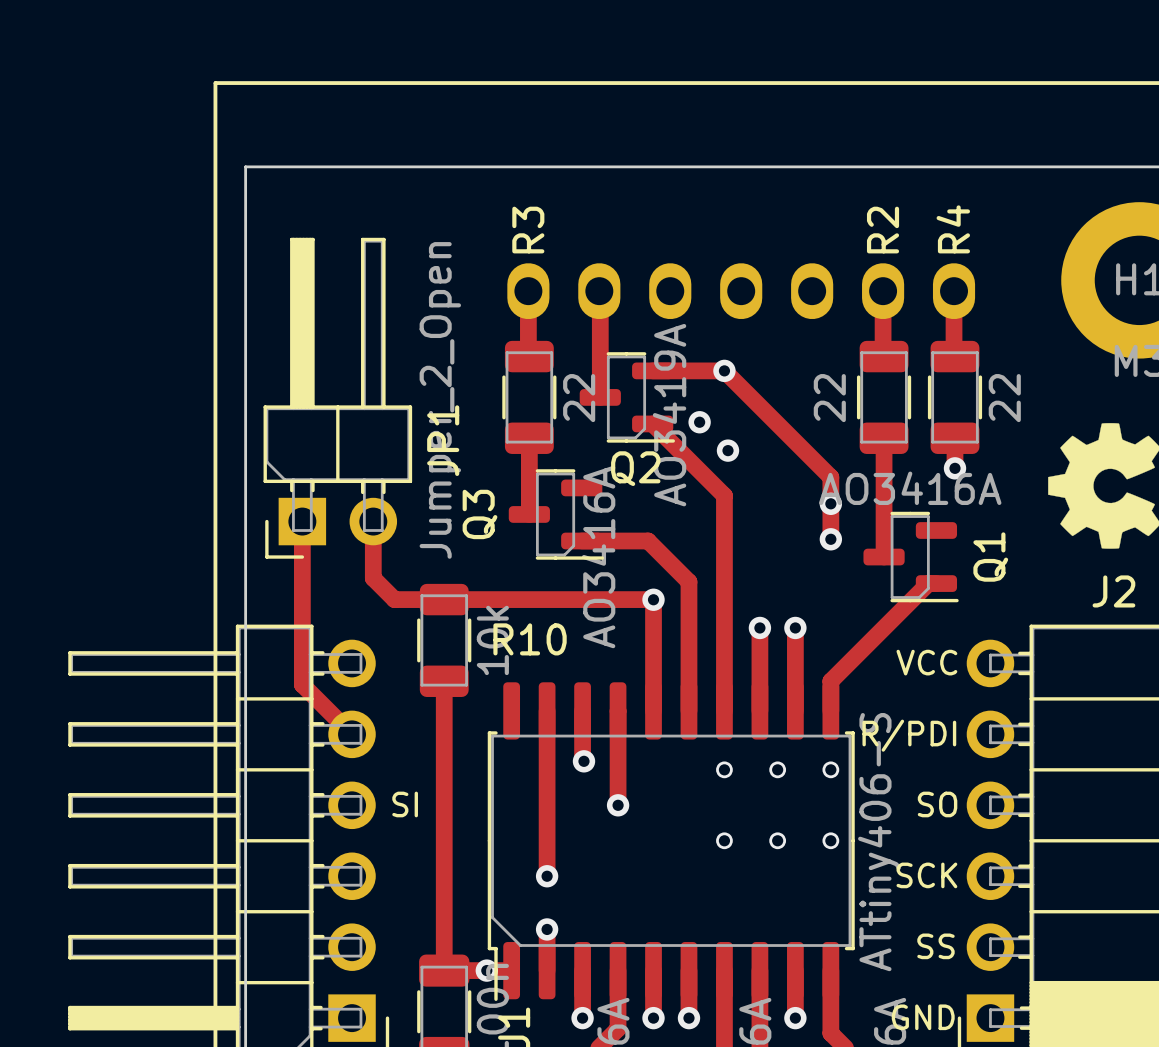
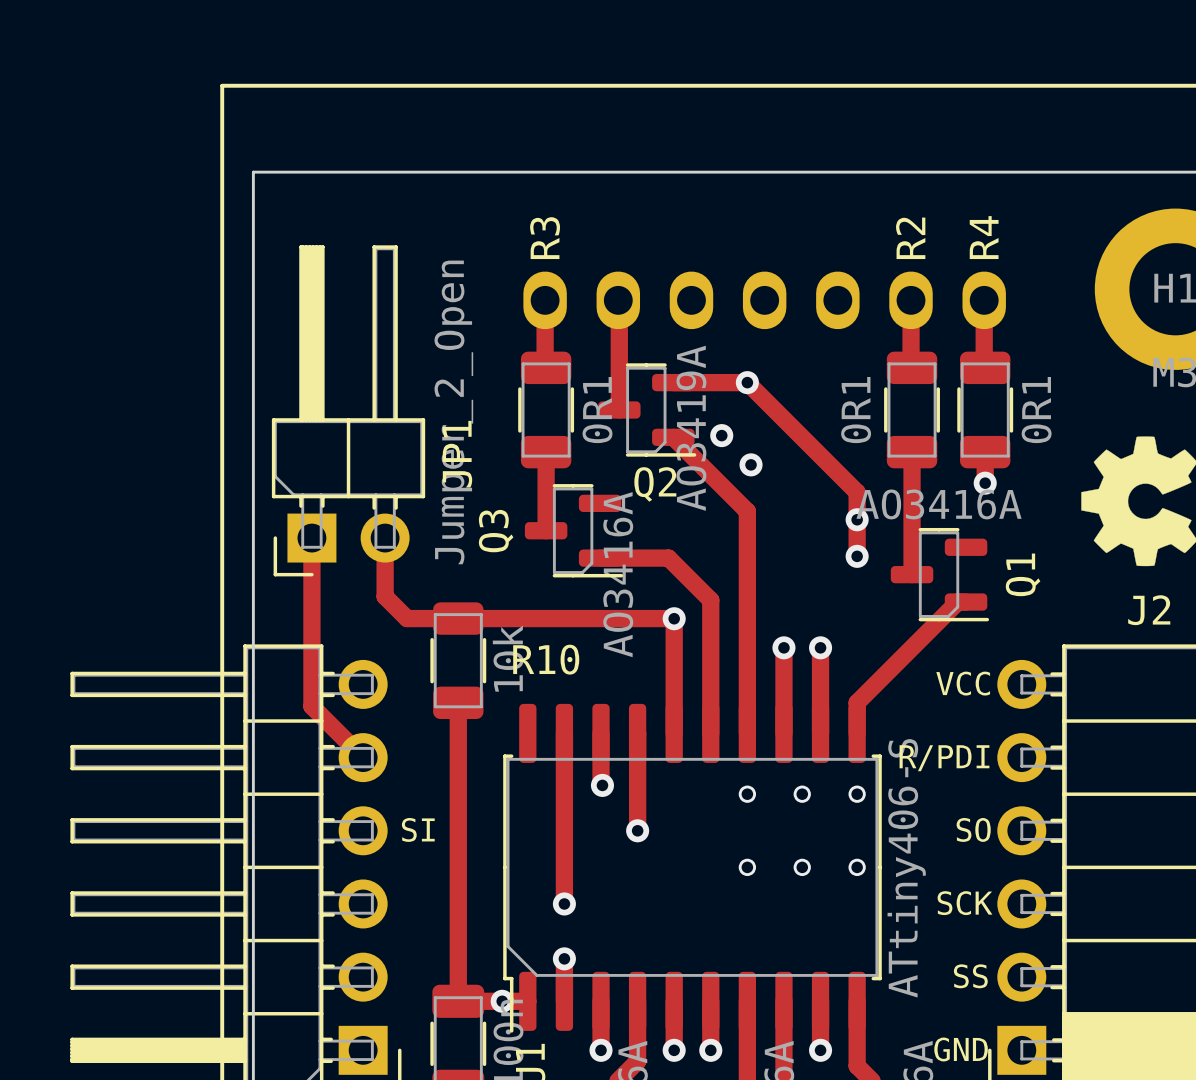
R3 value: 22 (579, 398) -> 0R1 (597, 410)
R2 value: 22 (829, 398) -> 0R1 (856, 410)
R4 value: 22 (1004, 398) -> 0R1 (1036, 410)

